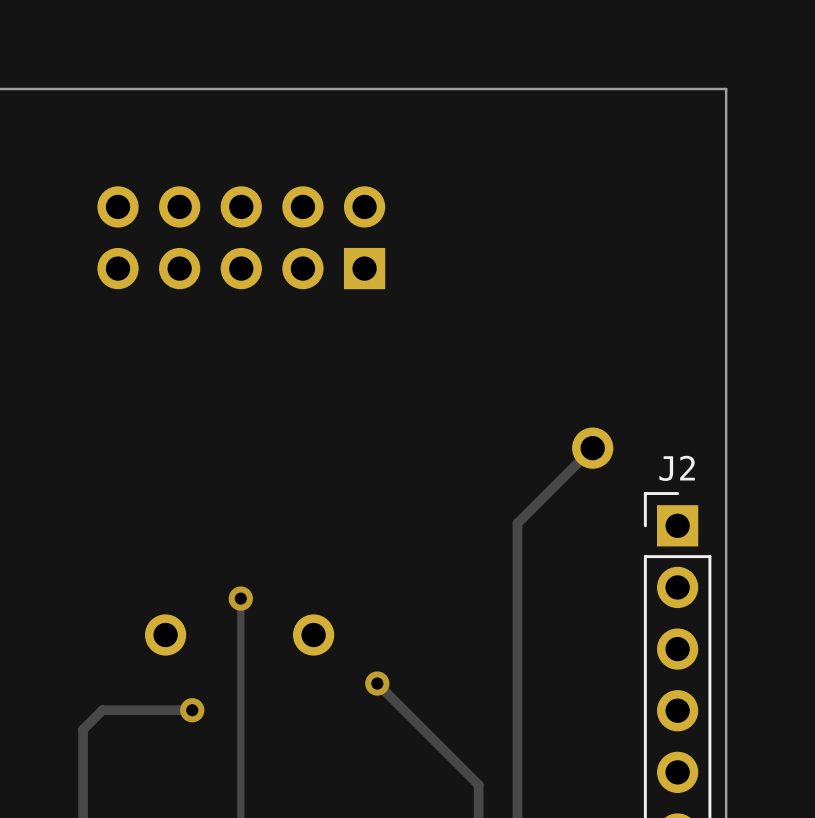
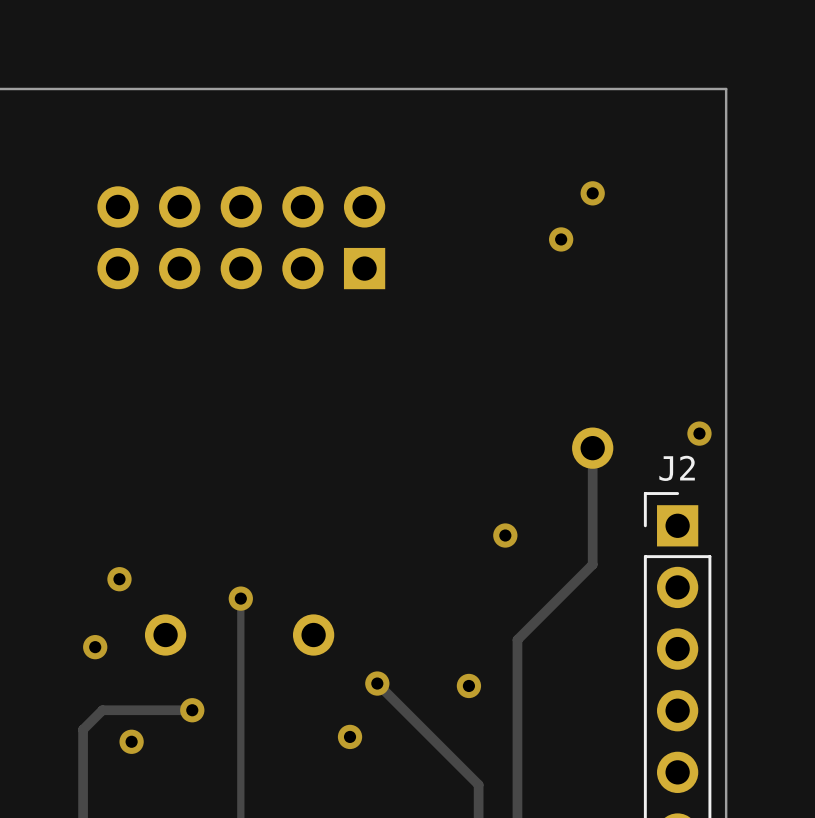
via: none -> (592, 193)
via: none -> (561, 239)
via: none -> (699, 433)
track: (592, 448) (517, 523) (517, 639) -> (592, 448) (592, 564) (517, 639)
via: none -> (505, 535)
via: none -> (119, 579)
via: none -> (95, 647)
via: none -> (468, 685)
via: none -> (350, 736)
via: none -> (131, 741)

